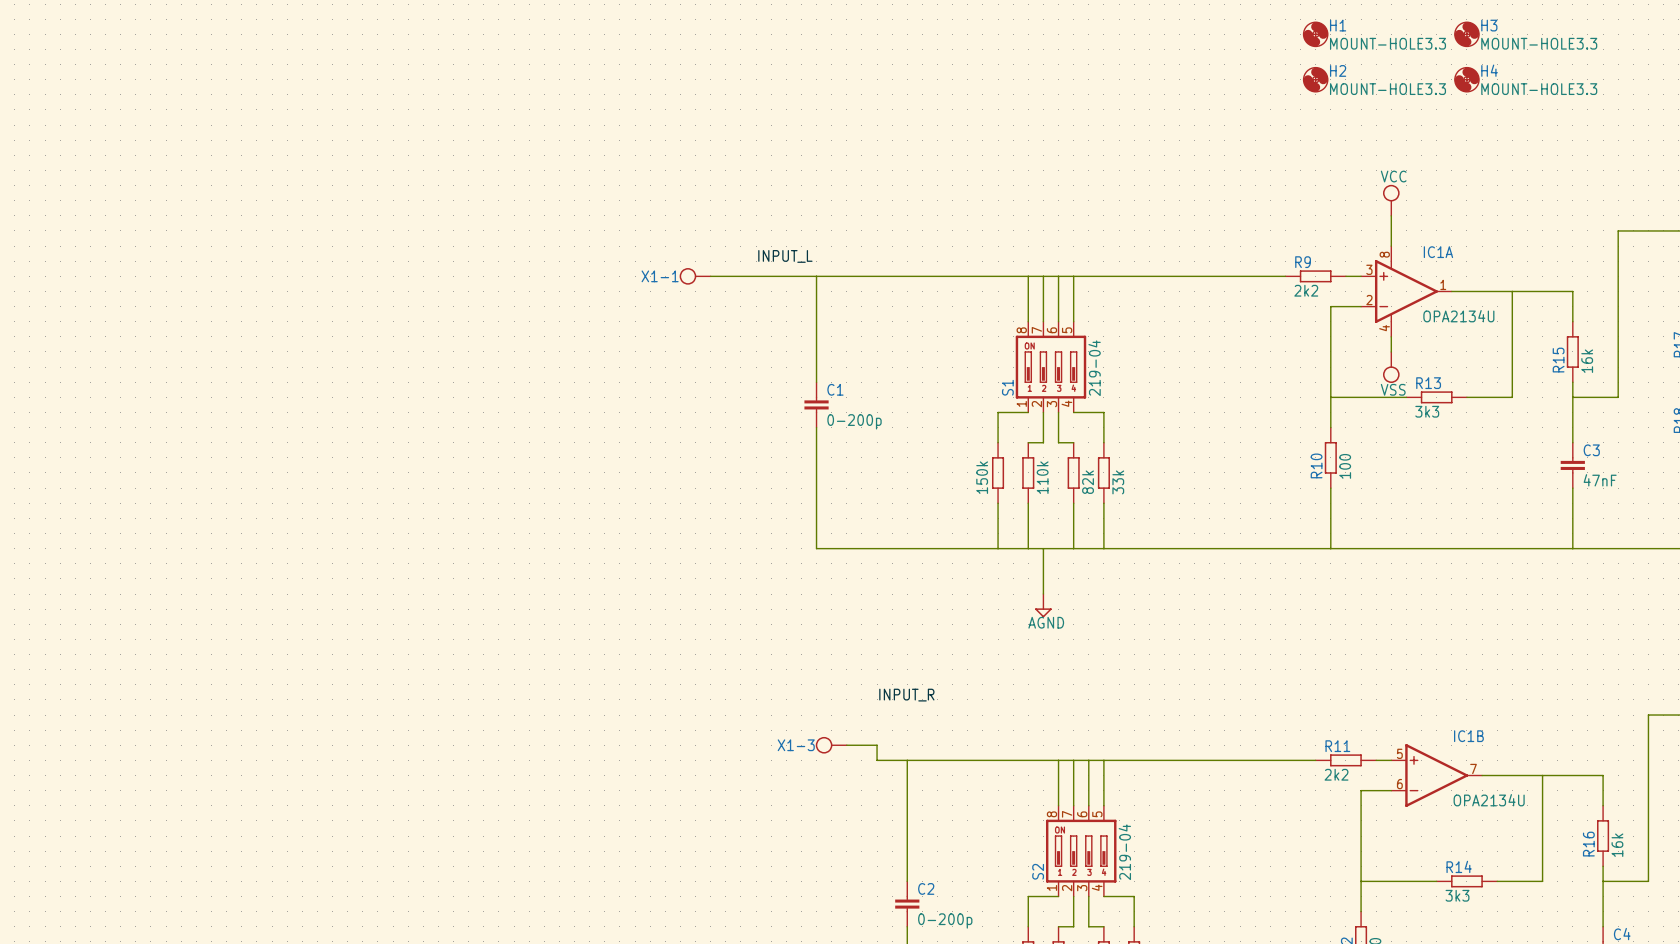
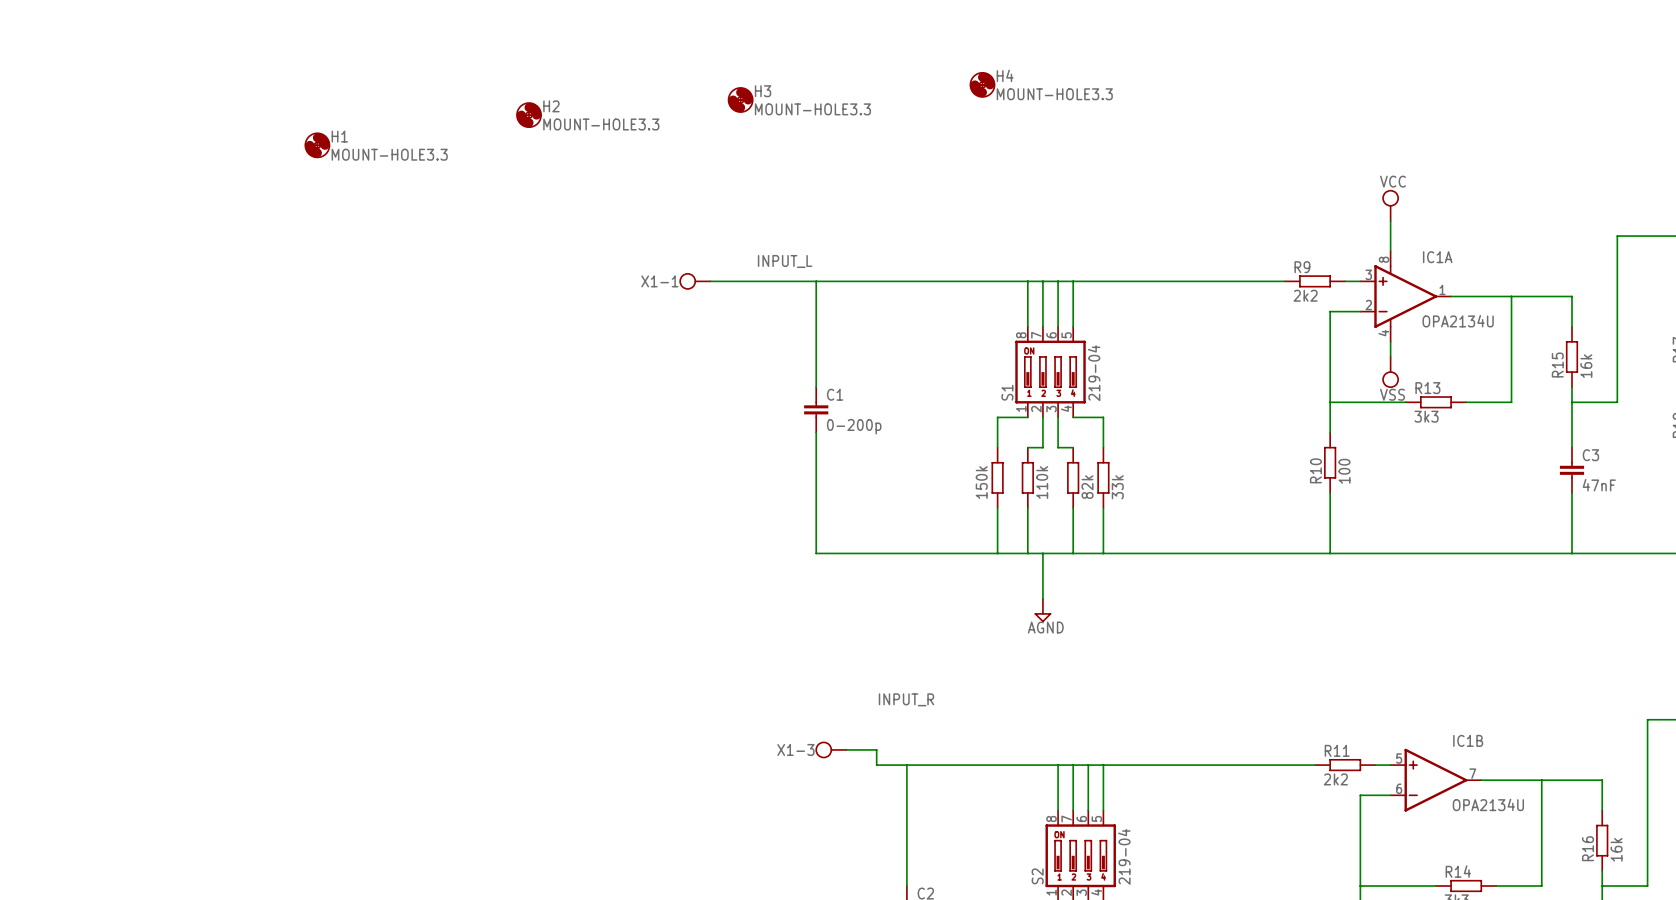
H1 position: (1315, 34) -> (317, 145)
H3 position: (1466, 34) -> (740, 99)
H2 position: (1315, 79) -> (529, 115)
H4 position: (1466, 79) -> (982, 84)

